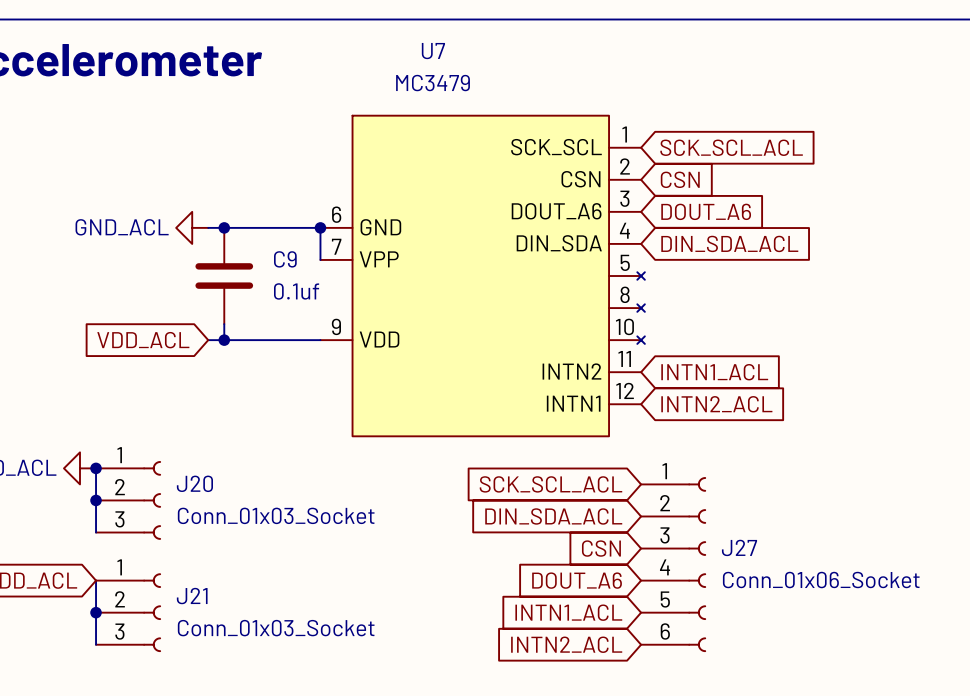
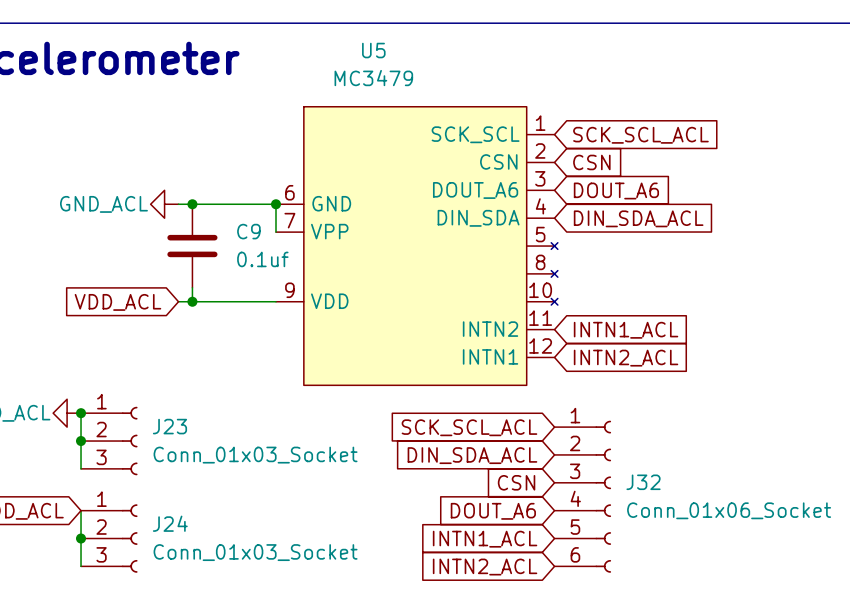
U7 name: U7 (433, 51) -> U5 (373, 50)
J20 name: J20 (194, 483) -> J23 (169, 426)
J27 name: J27 (739, 547) -> J32 (643, 482)
J21 name: J21 (192, 596) -> J24 (170, 523)

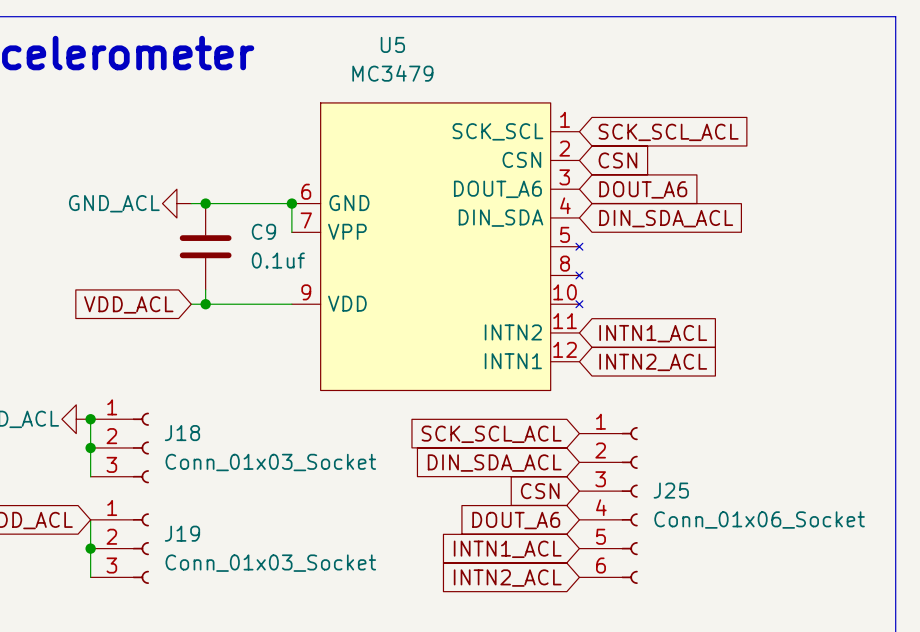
J23 name: J23 (169, 426) -> J18 (182, 433)
J32 name: J32 (643, 482) -> J25 (671, 490)
J24 name: J24 (170, 523) -> J19 (182, 533)

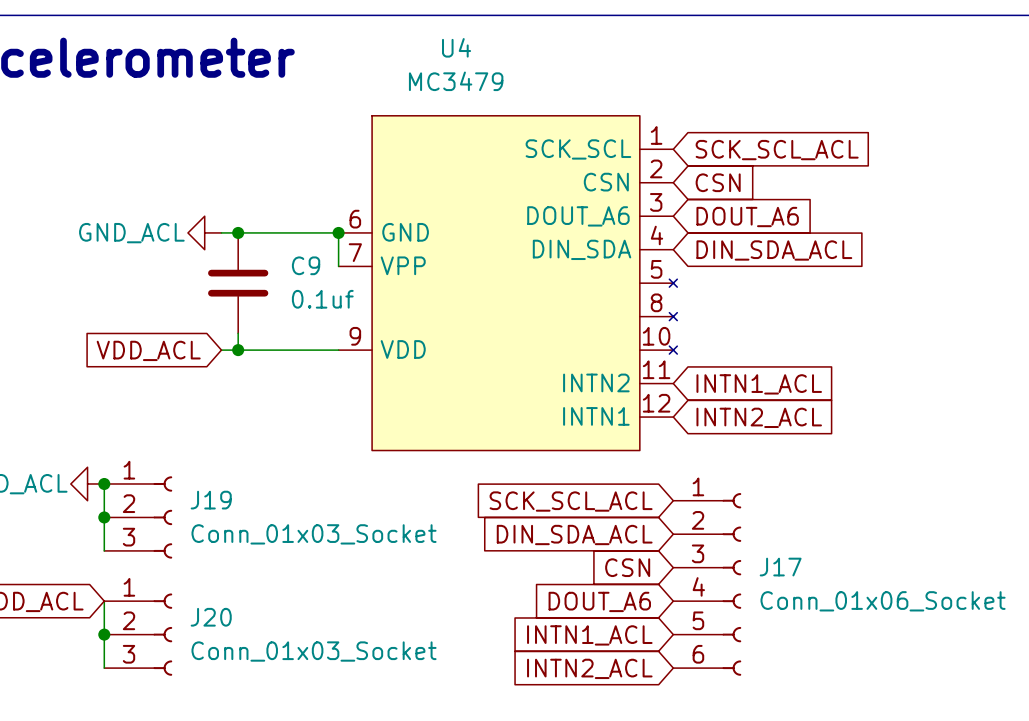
U5 name: U5 (392, 44) -> U4 (456, 47)
J18 name: J18 (182, 433) -> J19 (211, 500)
J25 name: J25 (671, 490) -> J17 (780, 567)
J19 name: J19 (182, 533) -> J20 (211, 617)

